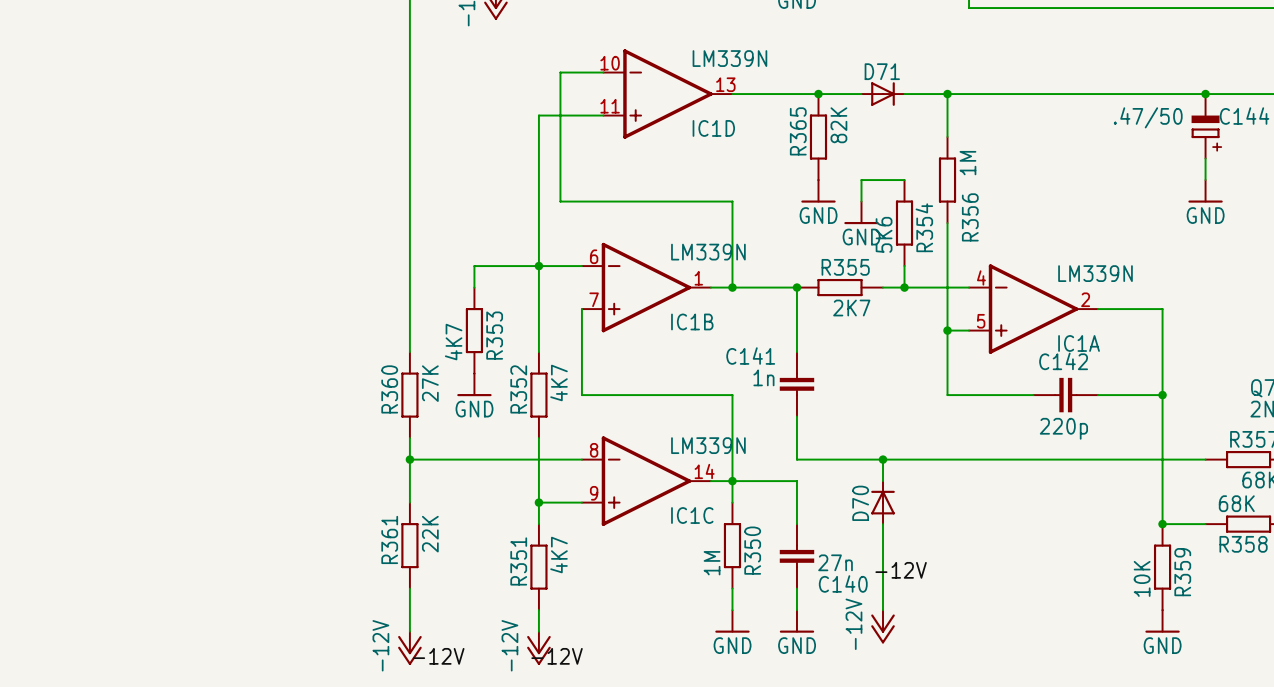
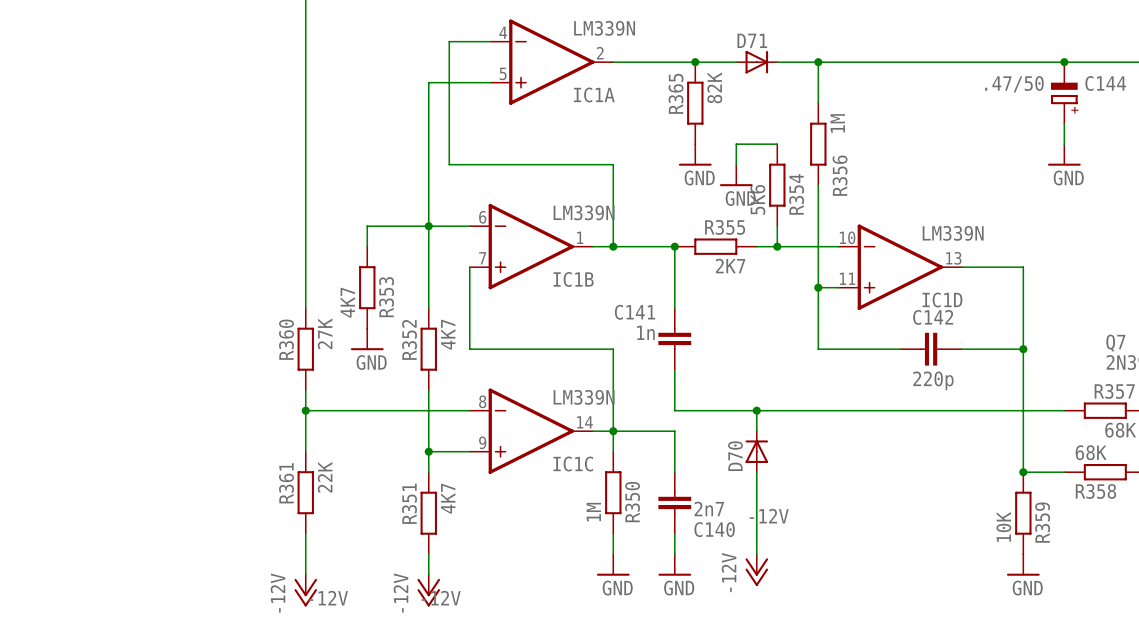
IC1D position: (667, 94) -> (900, 267)
IC1A position: (1033, 309) -> (551, 62)
C140 value: 27n (835, 562) -> 2n7 (709, 508)

